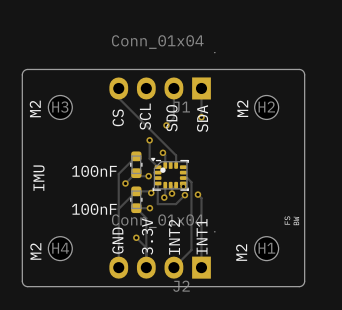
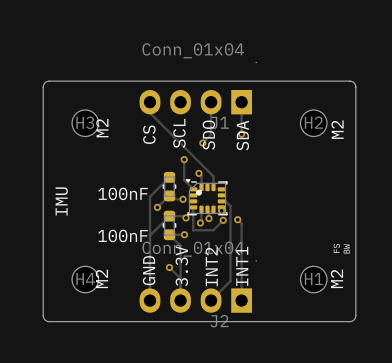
text position: M2 (35, 108) -> M2 (102, 128)
text position: M2 (242, 108) -> M2 (337, 129)
text position: M2 (35, 251) -> M2 (101, 278)
text position: M2 (241, 252) -> M2 (336, 278)

